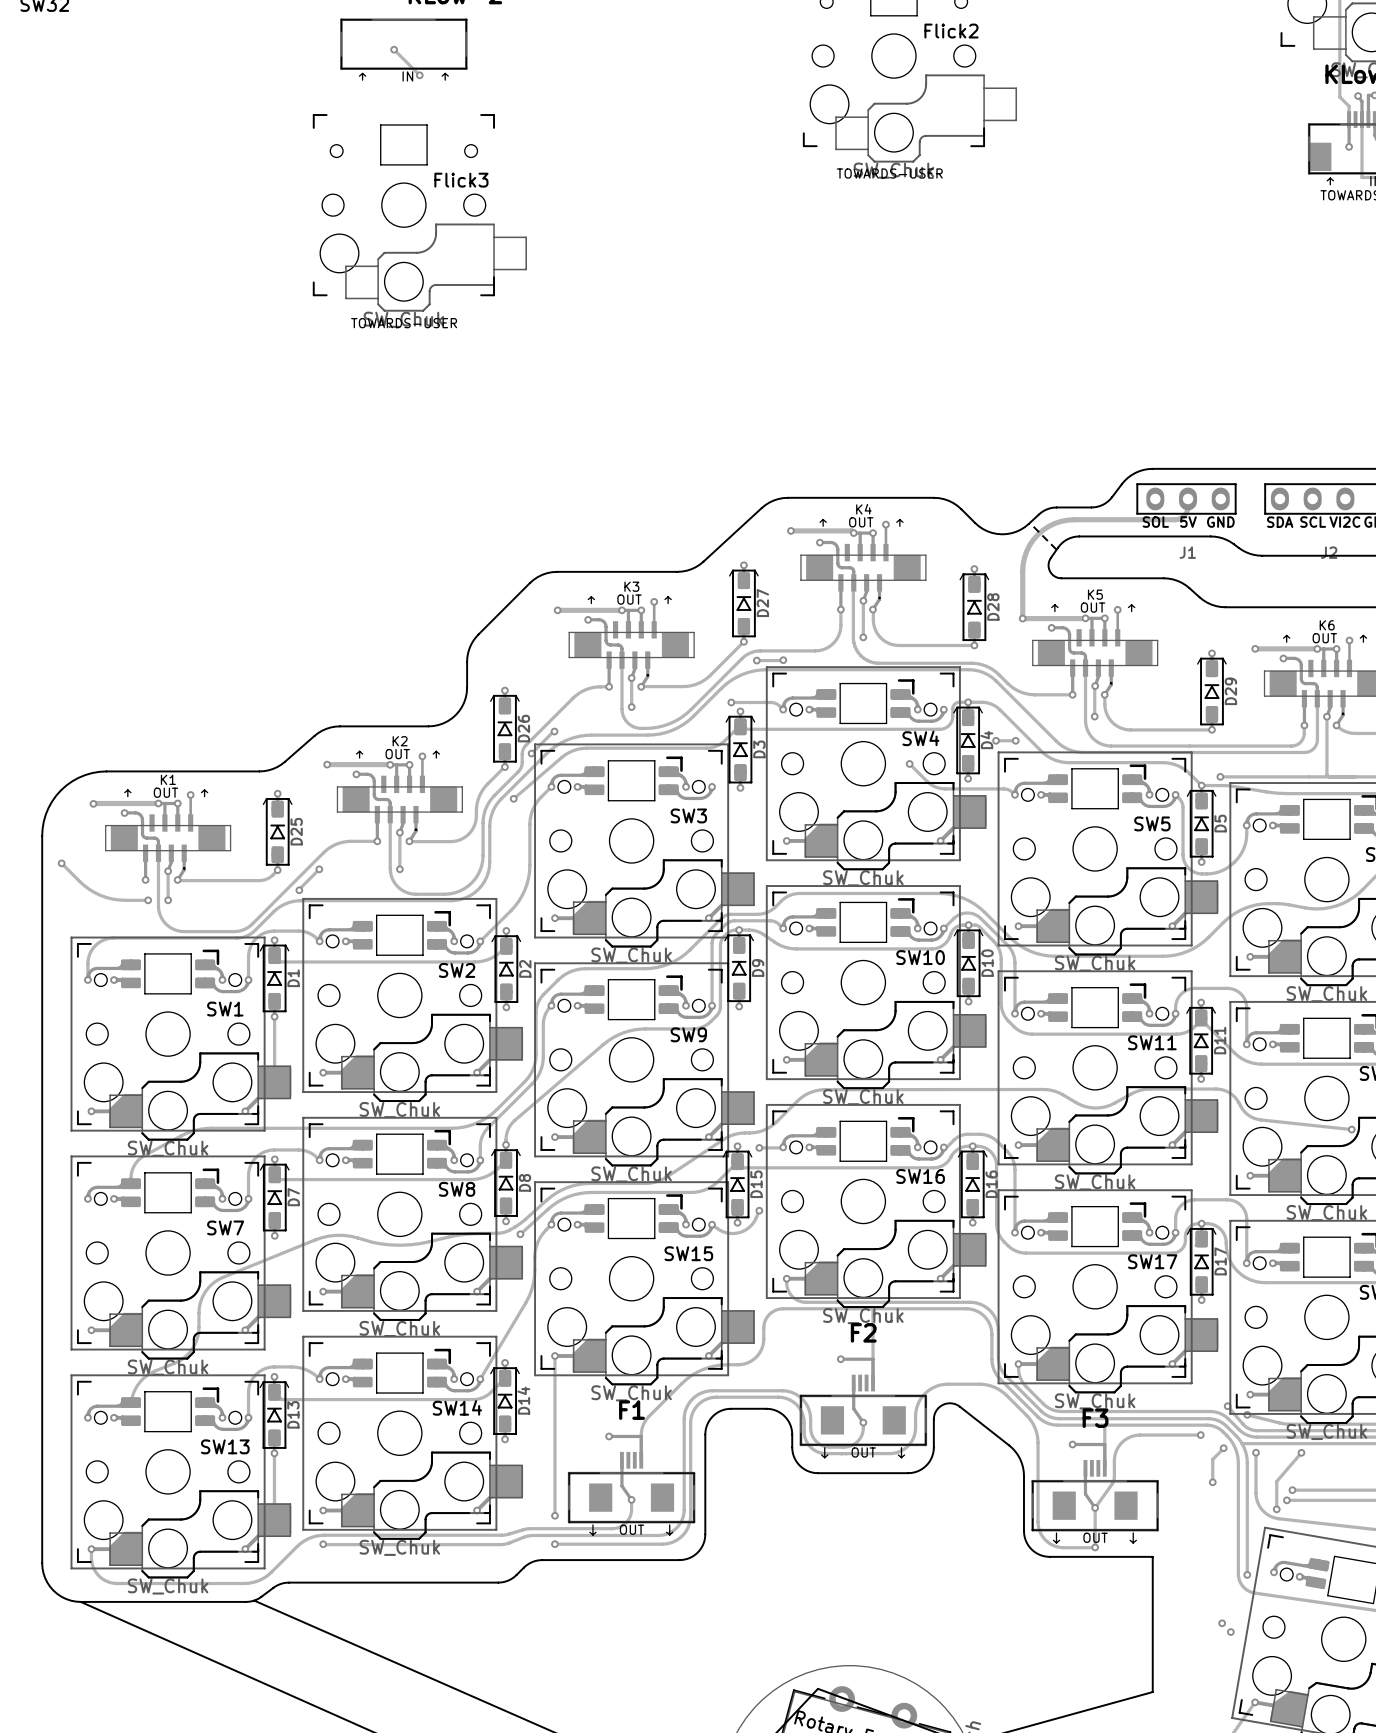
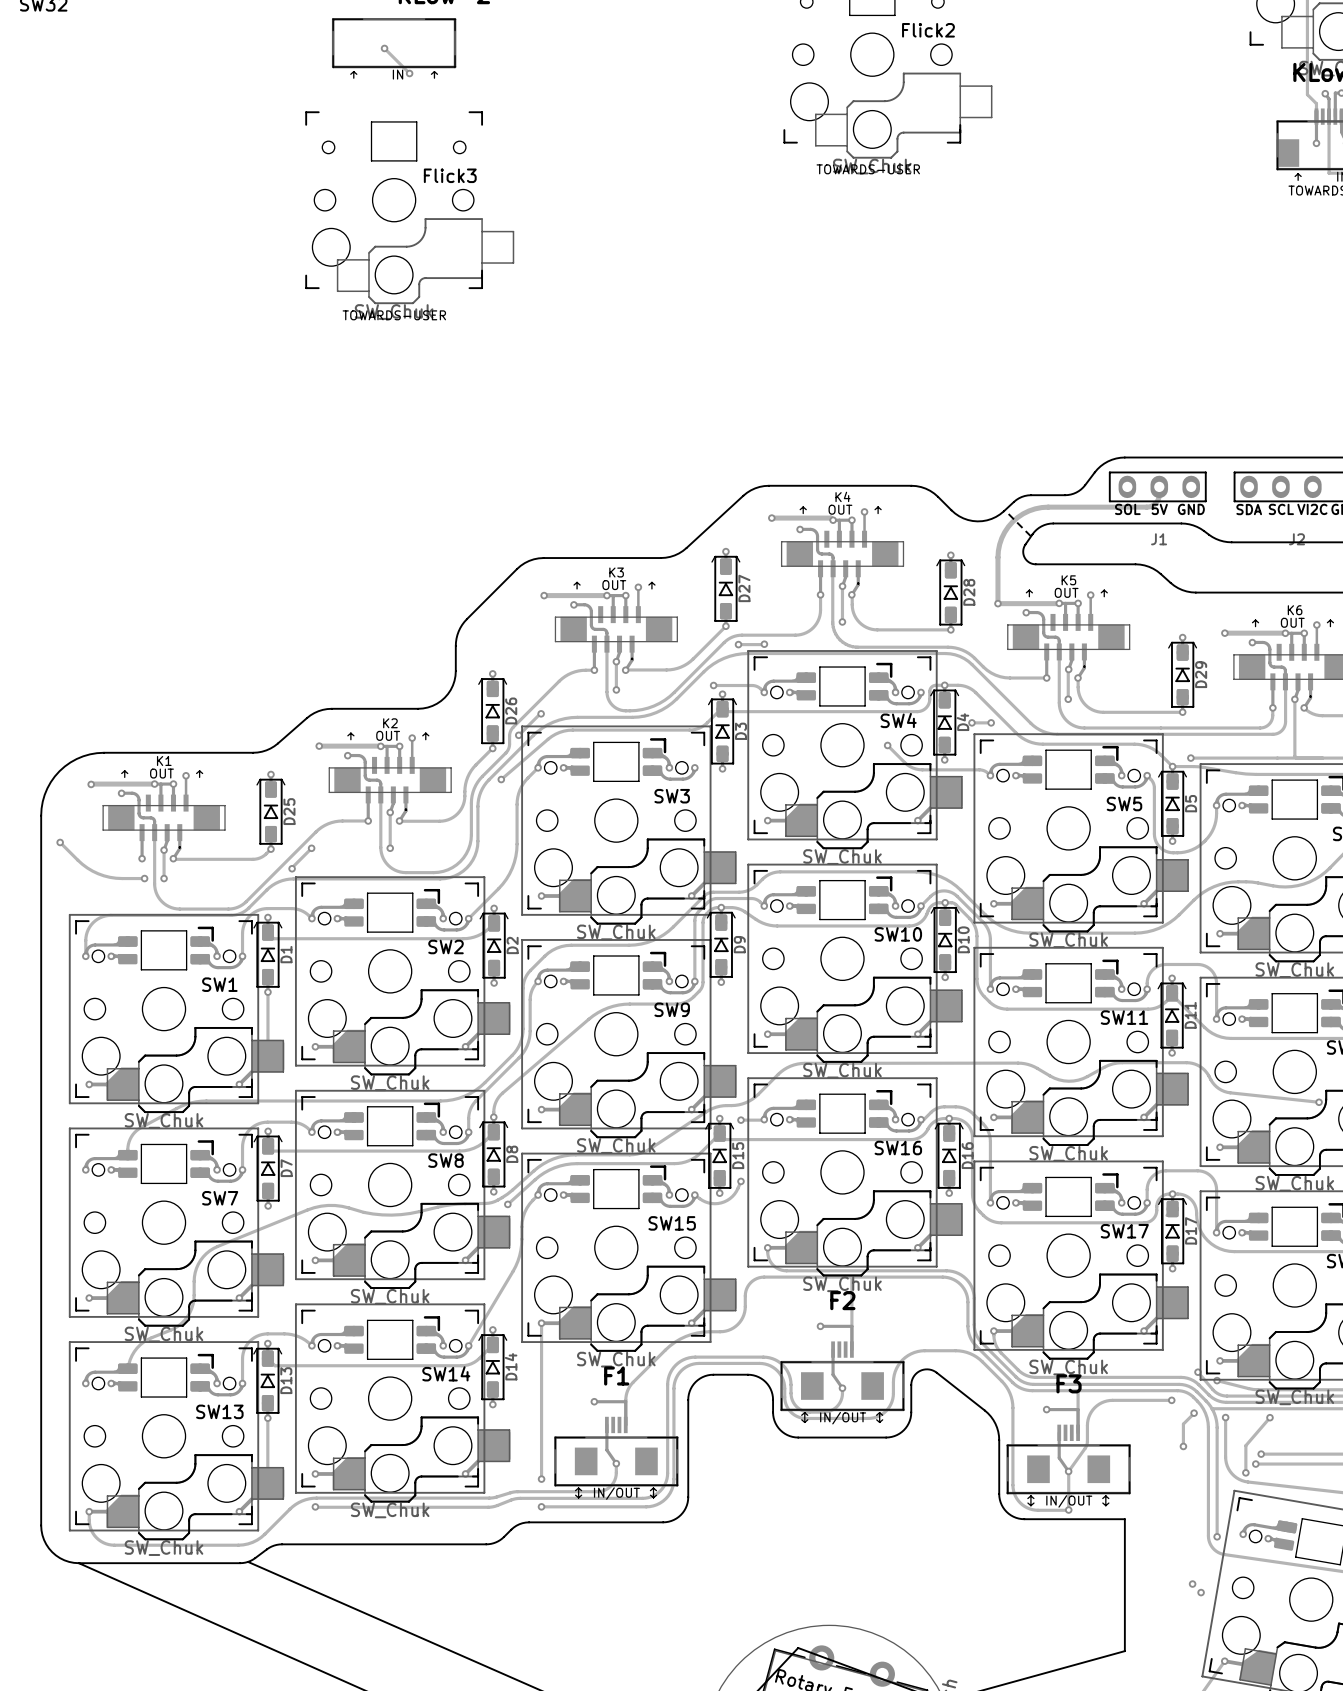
F2 footprint: [799, 1355, 928, 1459] -> [780, 1322, 905, 1424]
F1 footprint: [567, 1432, 696, 1536] -> [554, 1397, 679, 1499]
F3 footprint: [1031, 1440, 1159, 1544] -> [1006, 1405, 1131, 1507]

